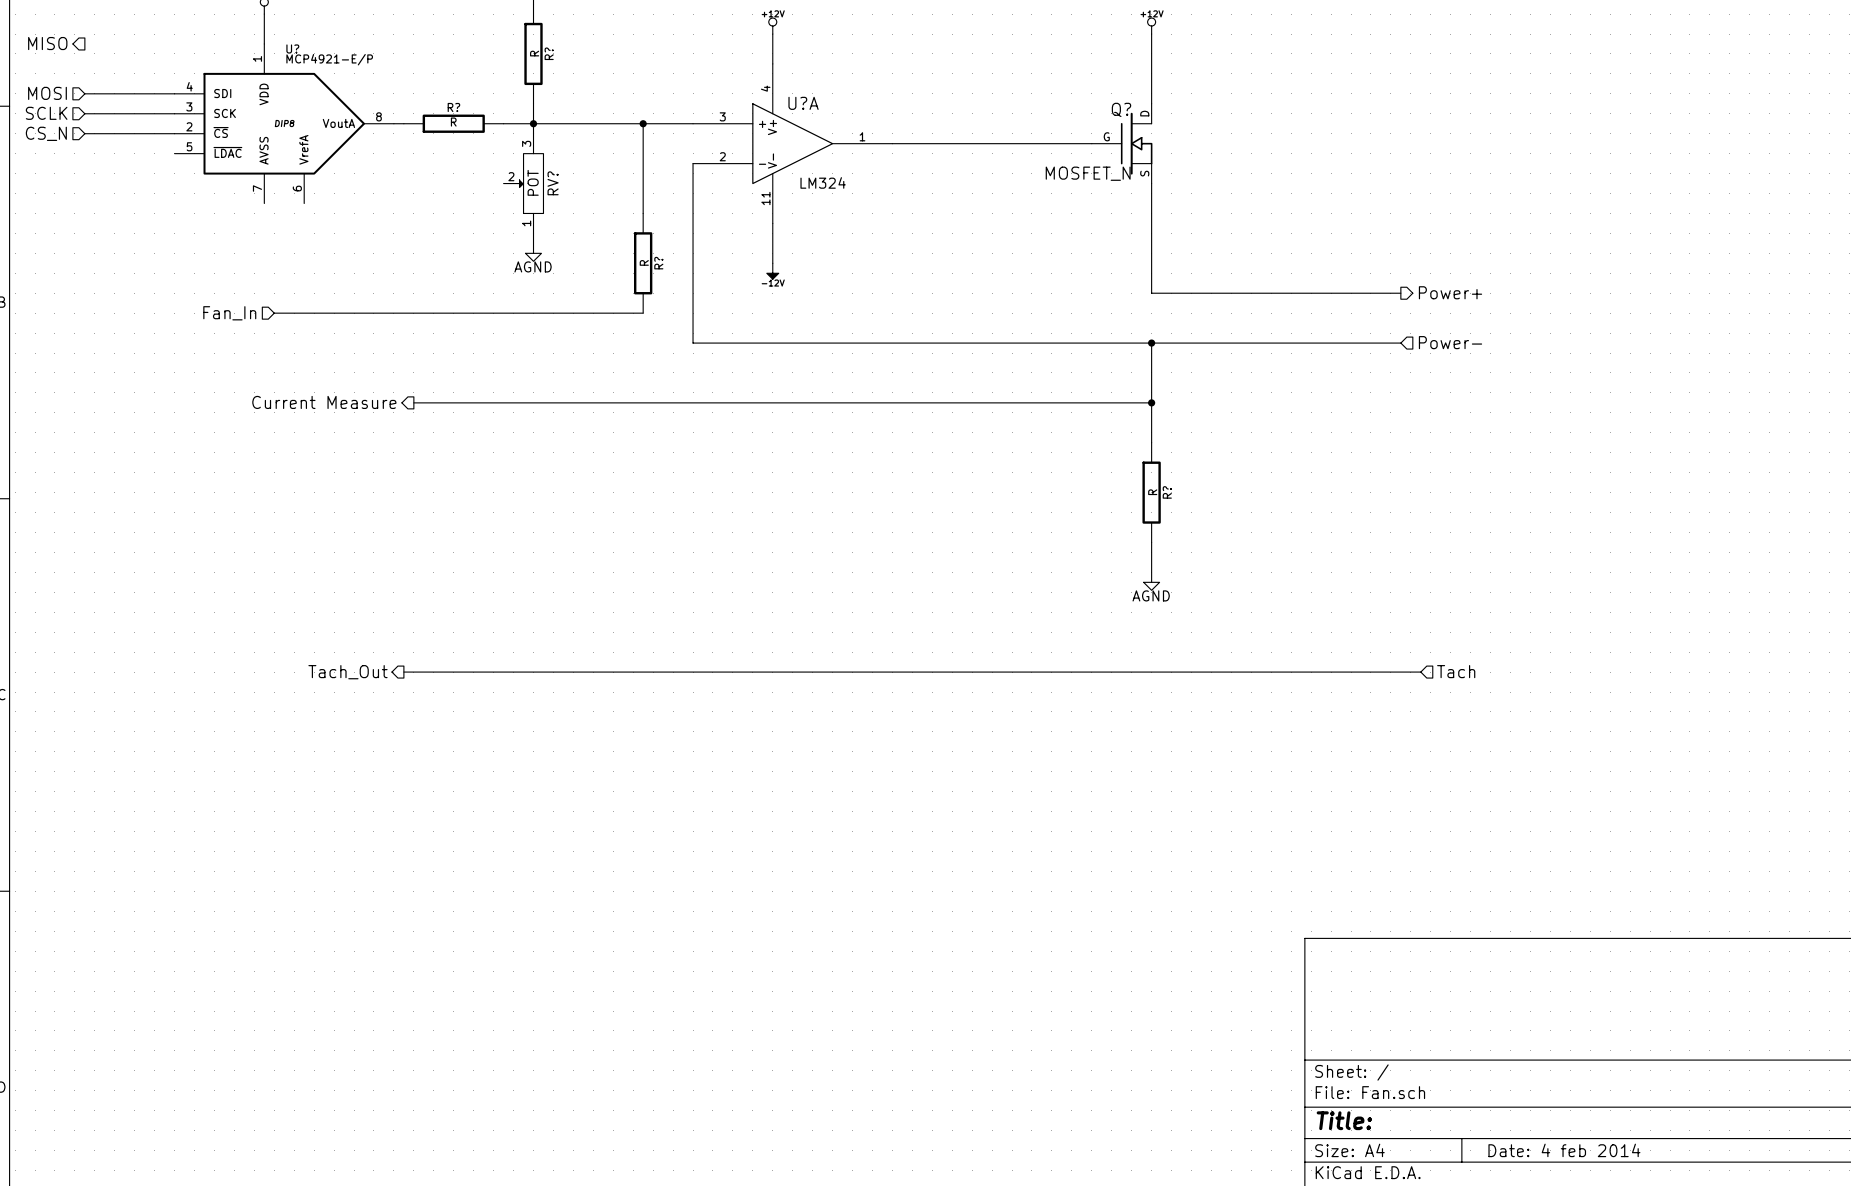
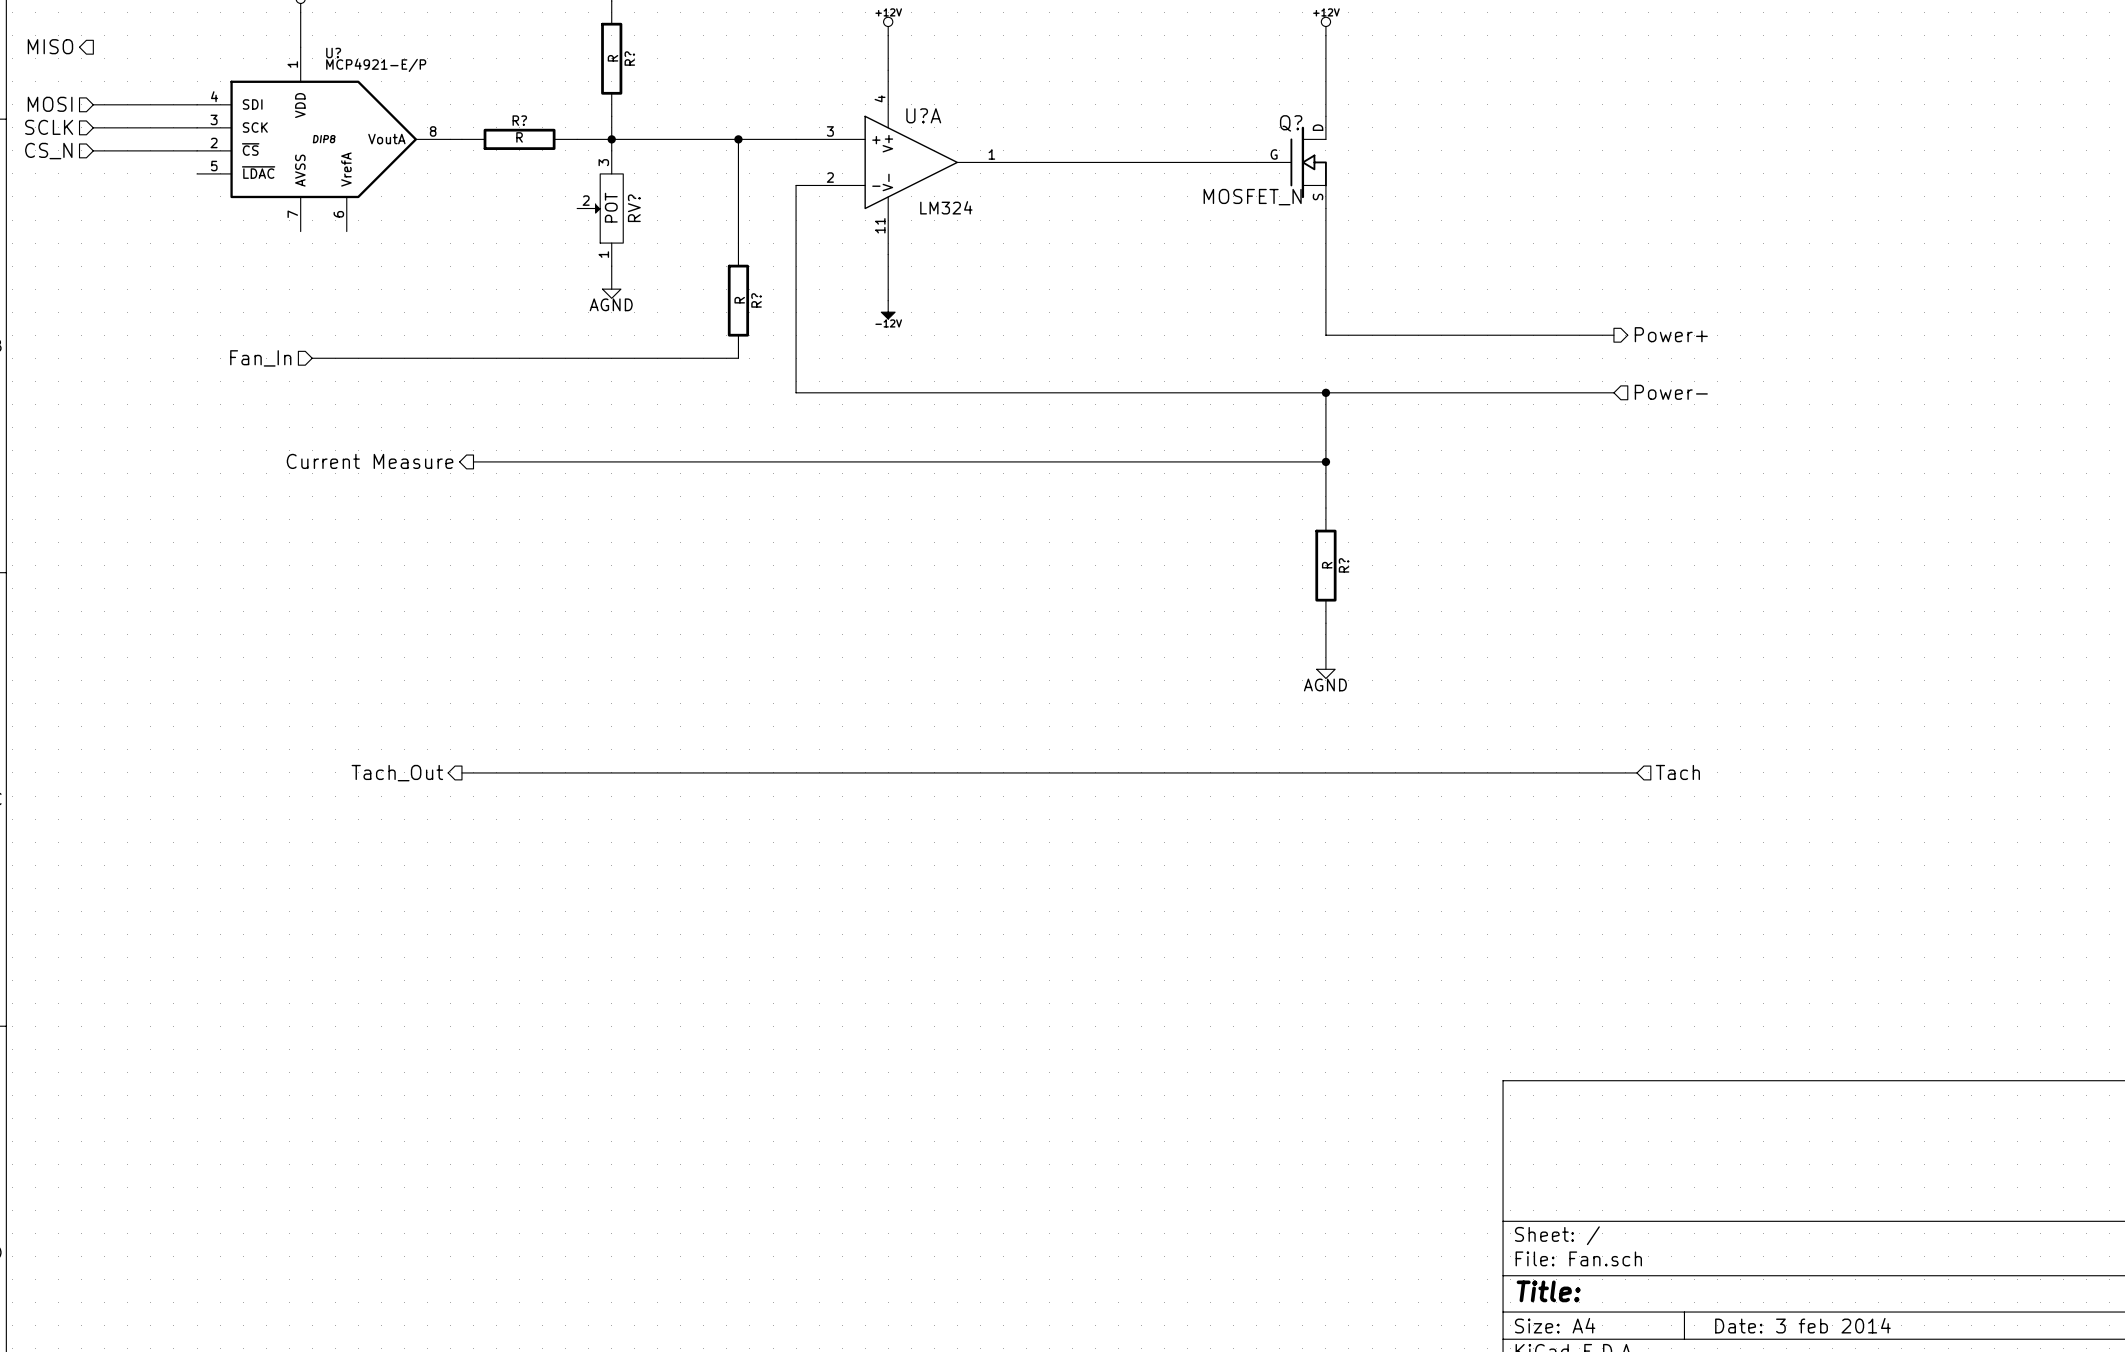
title block: Date: 4 feb 2014 (1564, 1150) -> Date: 3 feb 2014 (1802, 1325)

